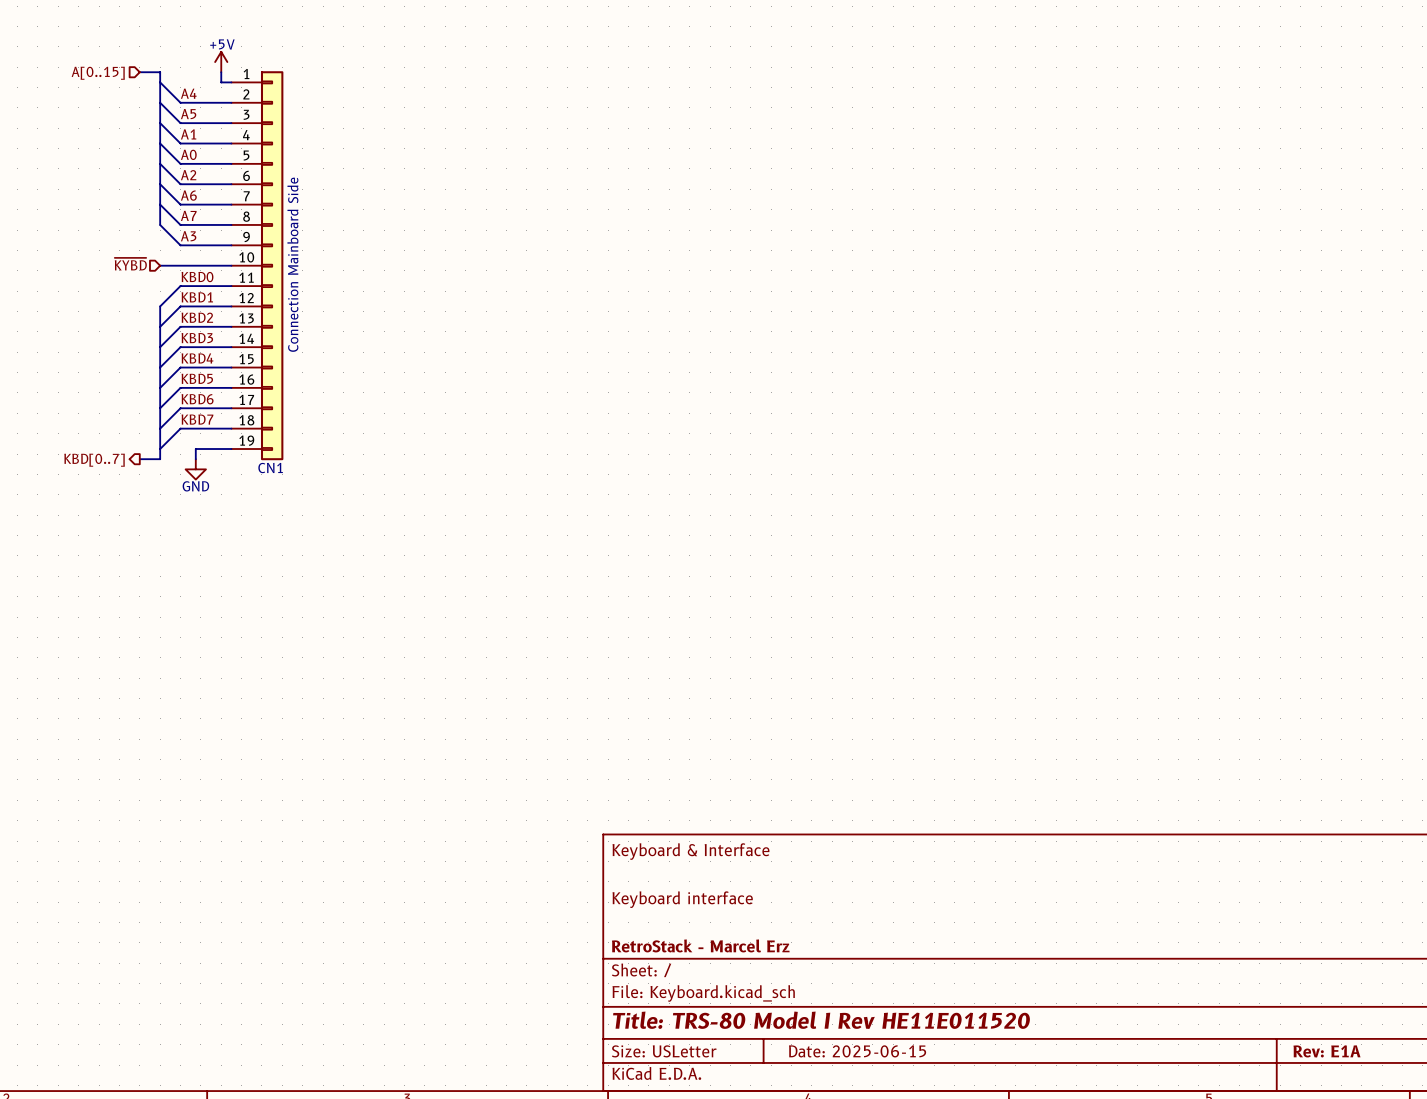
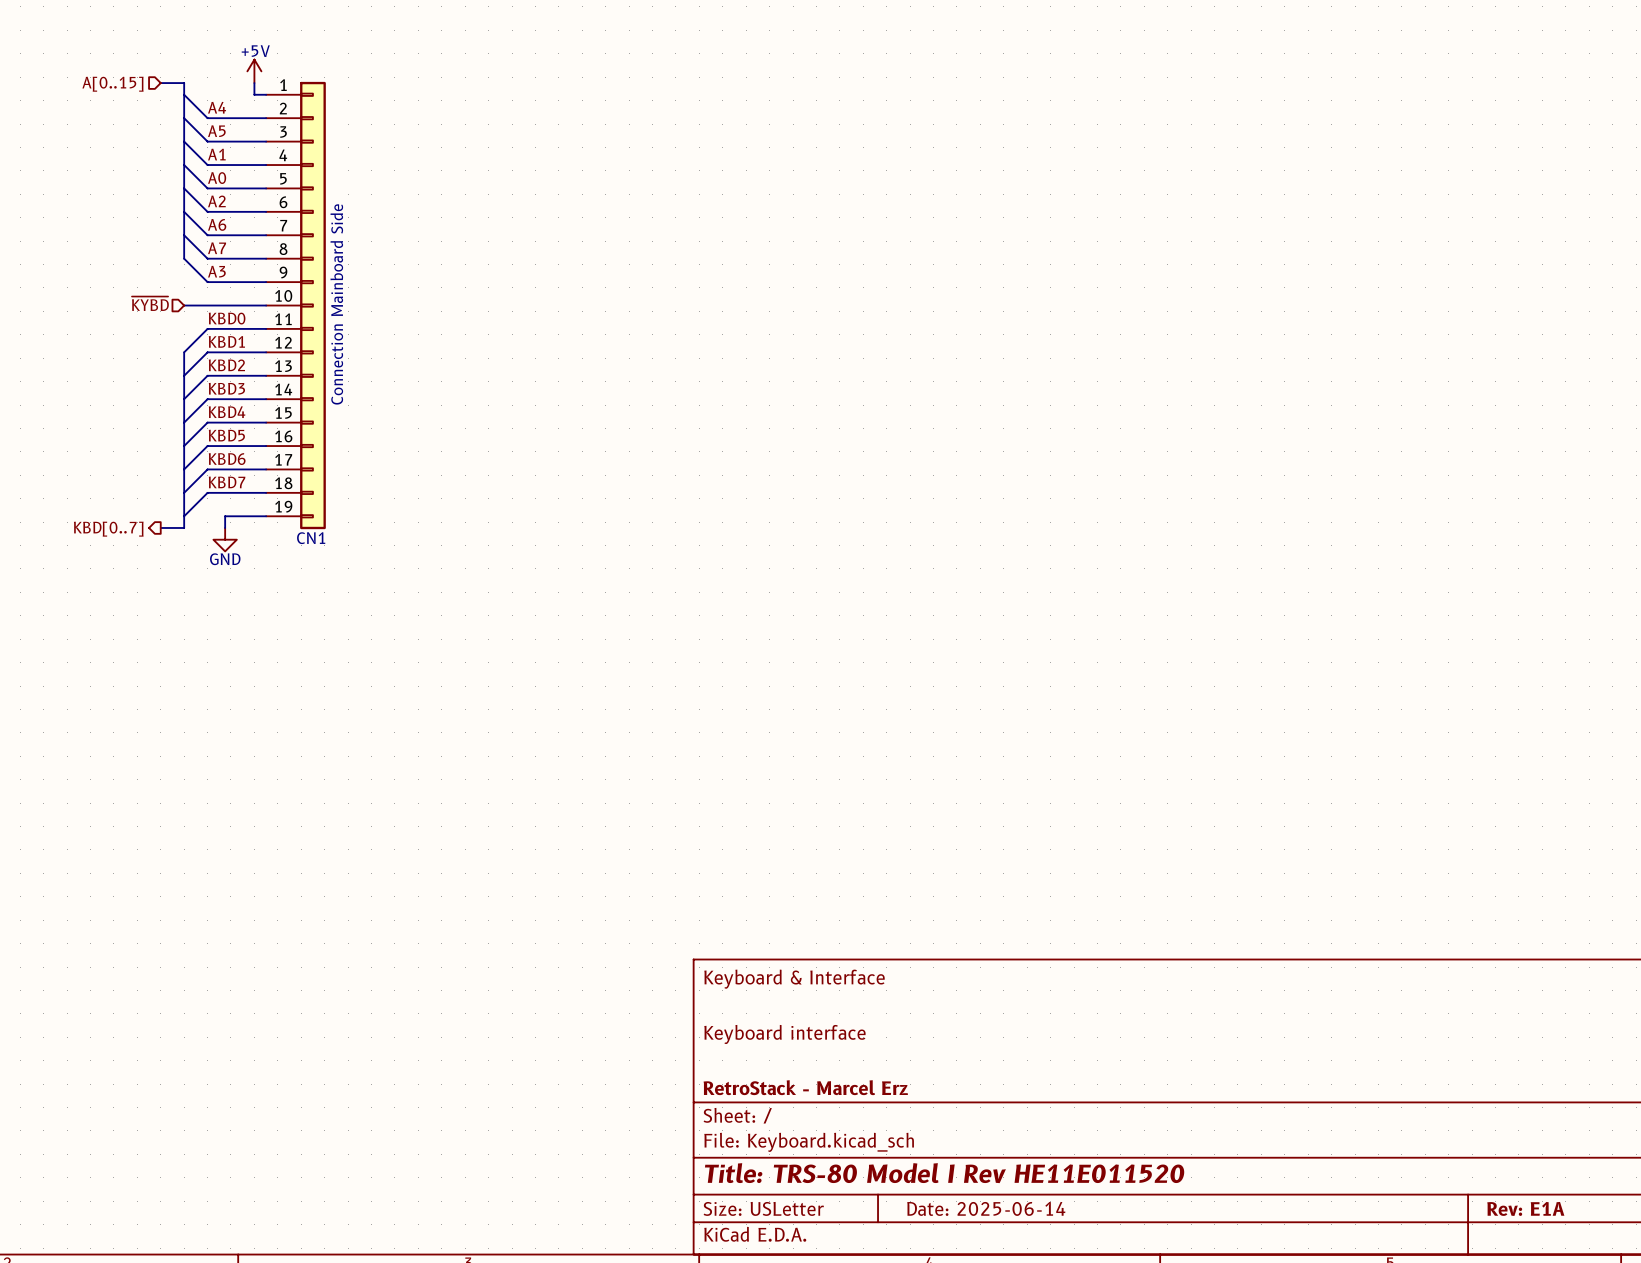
title block: Date: 2025-06-15 (857, 1051) -> Date: 2025-06-14 (986, 1208)

